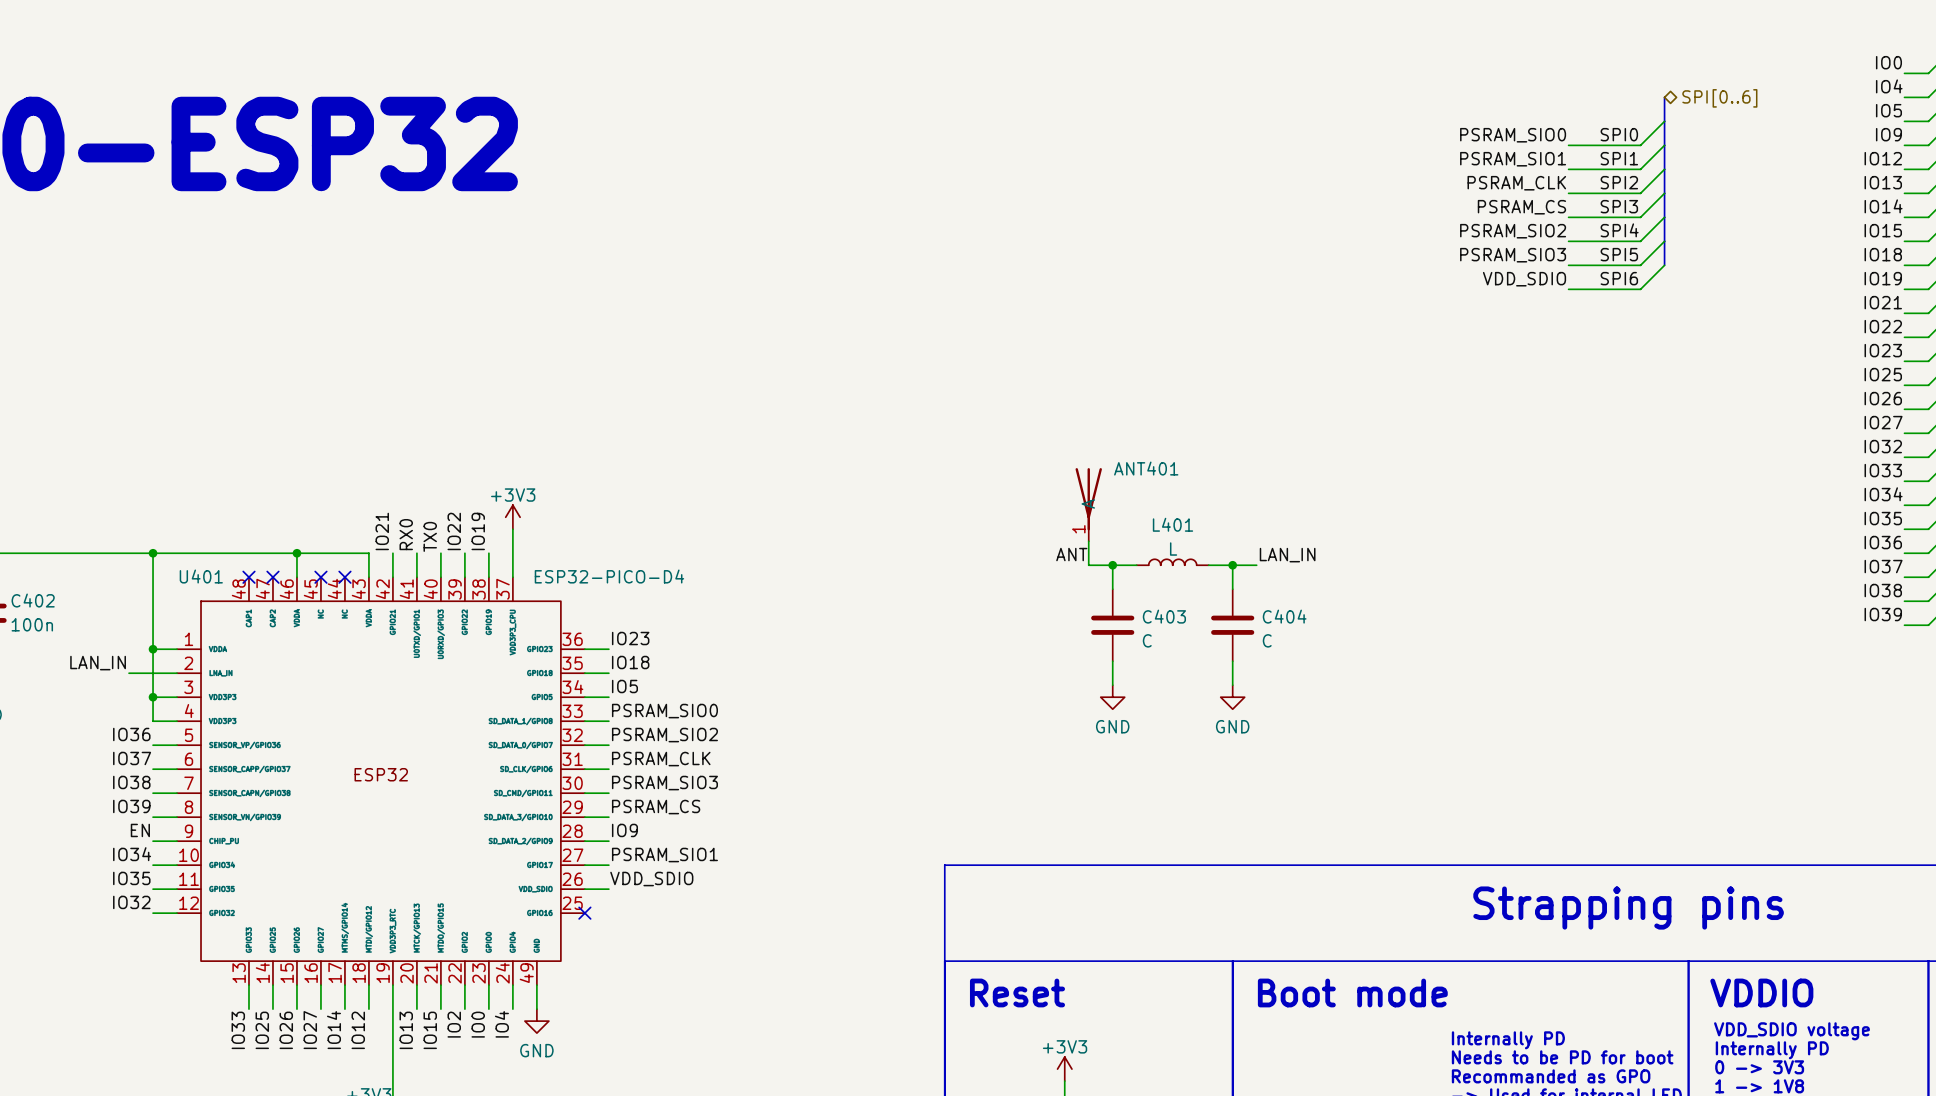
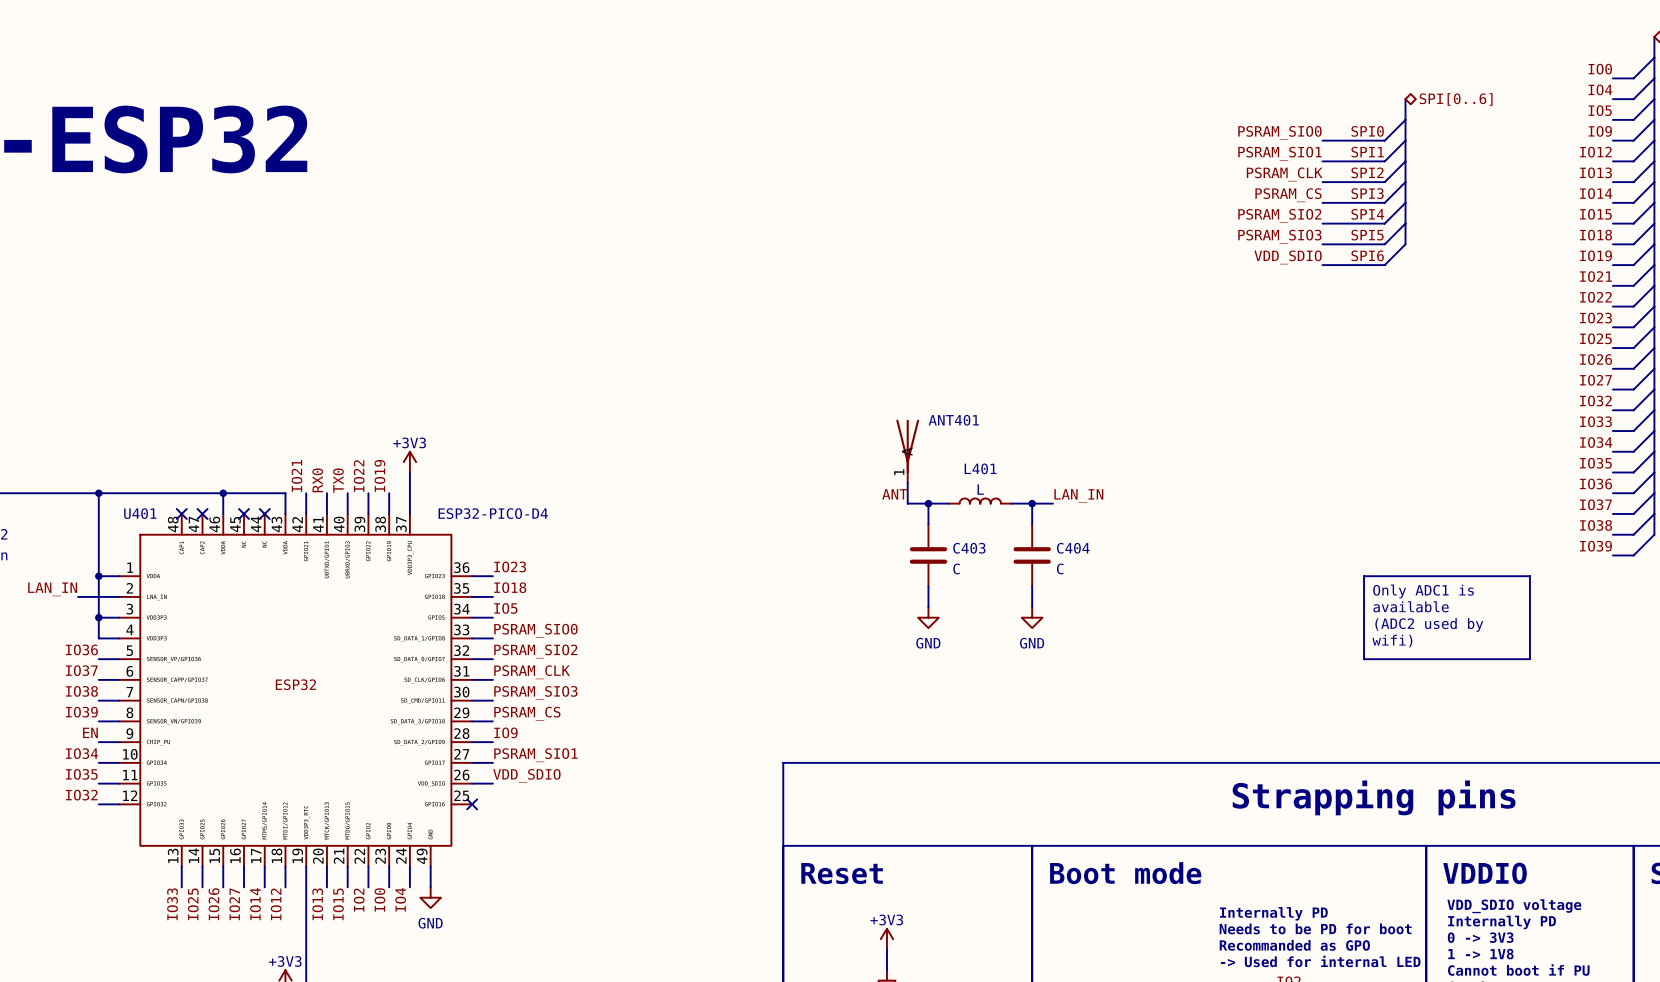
line: none -> (1364, 576) (1529, 576) (1529, 659) (1364, 659) (1364, 576)
text: none -> Only ADC1 is (1423, 591)
text: none -> available (1411, 606)
text: none -> (ADC2 used by (1429, 624)
text: none -> wifi) (1392, 641)

